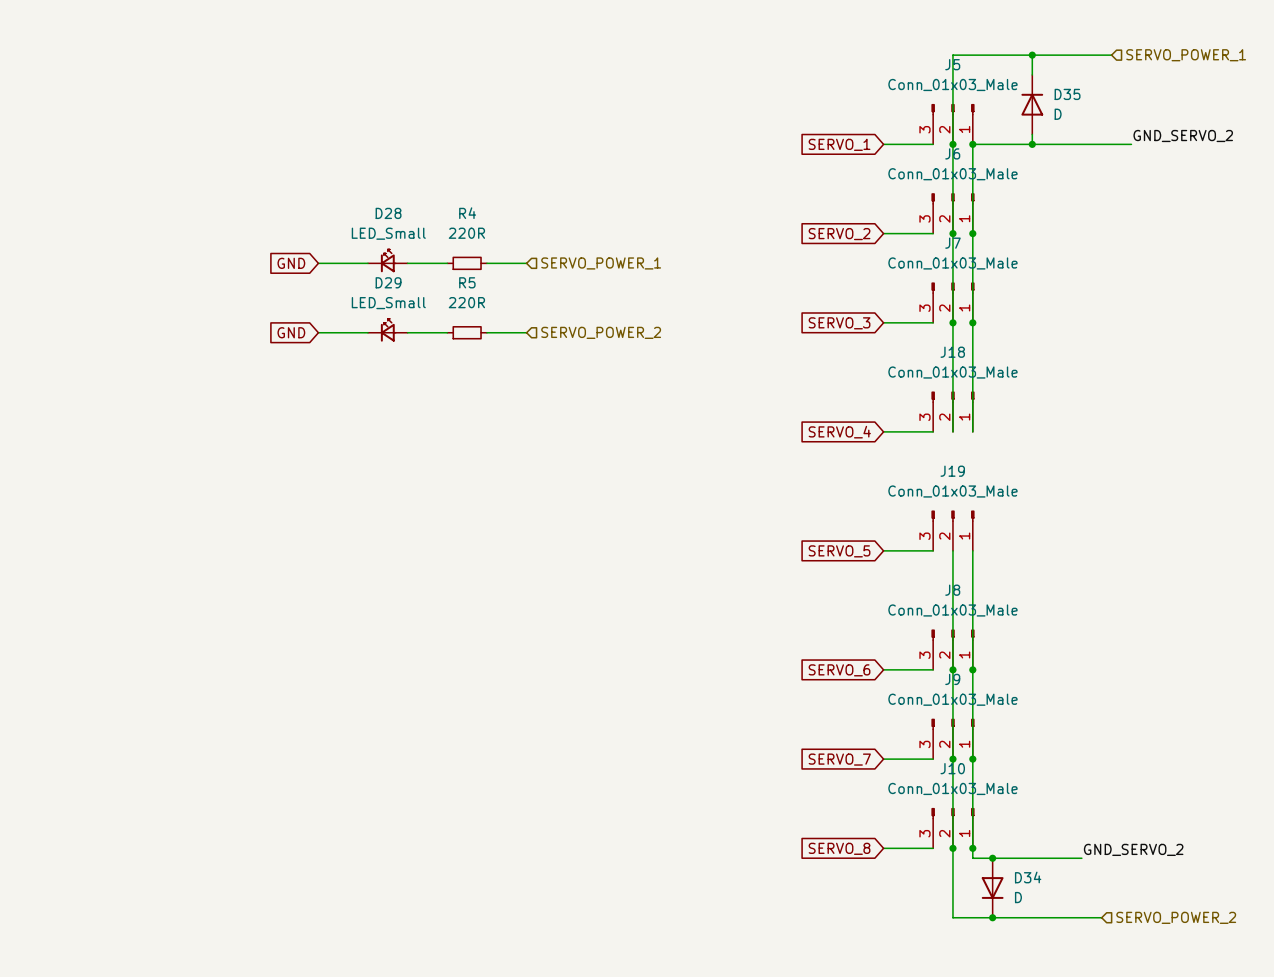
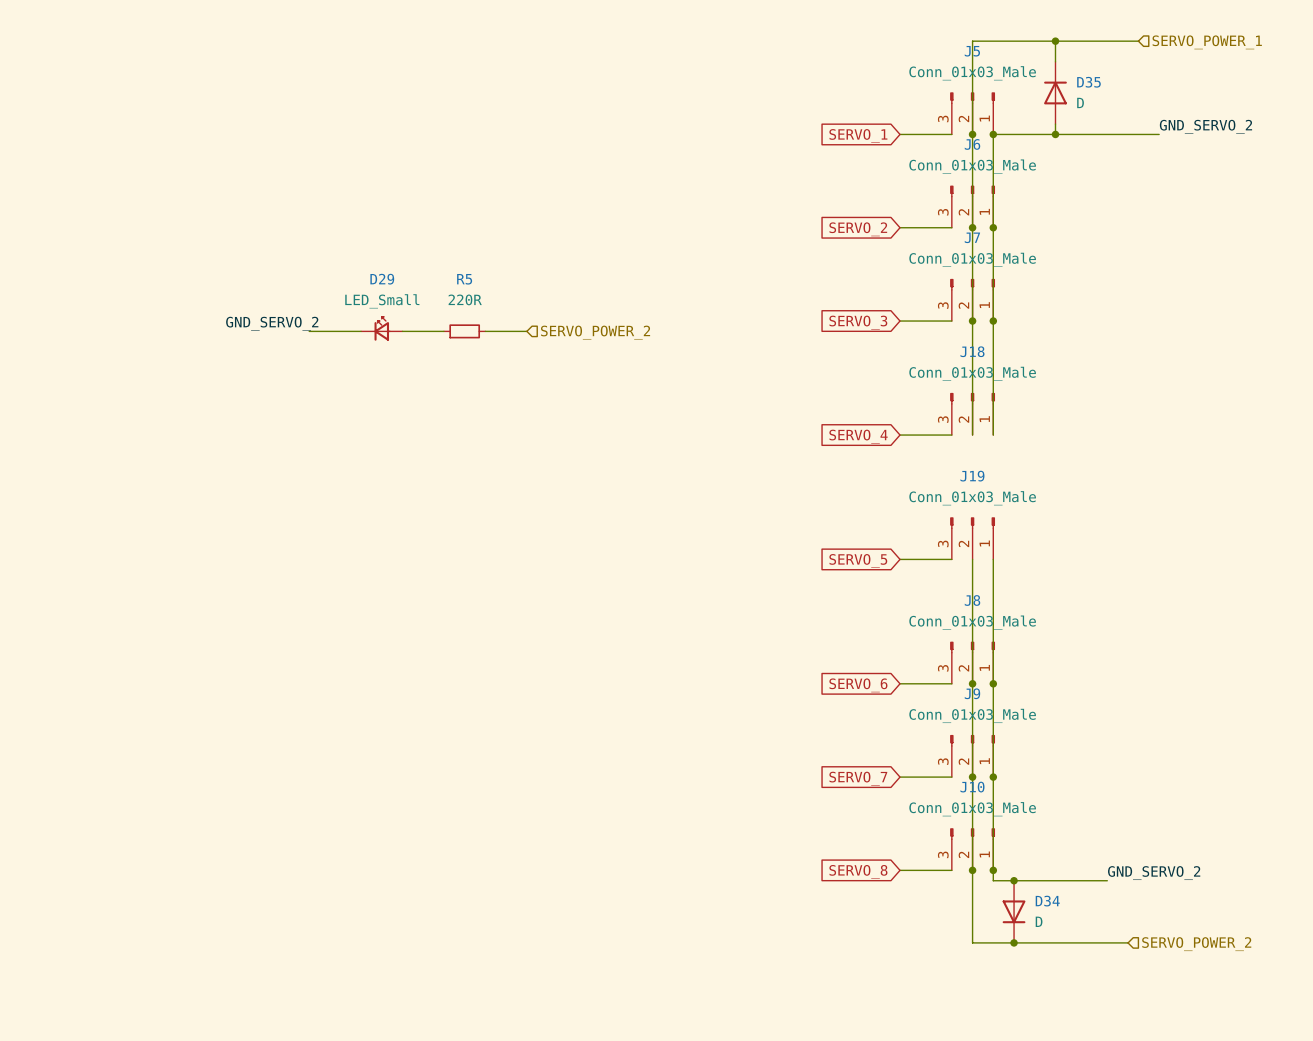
D28: LED_Small (387, 260) -> none
global label: GND (291, 263) -> none
wire: (318, 263) (367, 263) -> none
wire: (407, 263) (447, 263) -> none
R4: 220R (467, 263) -> none
wire: (486, 263) (526, 263) -> none
hierarchical label: SERVO_POWER_1 (601, 263) -> none
label: none -> GND_SERVO_2 (272, 323)
global label: GND (291, 332) -> none

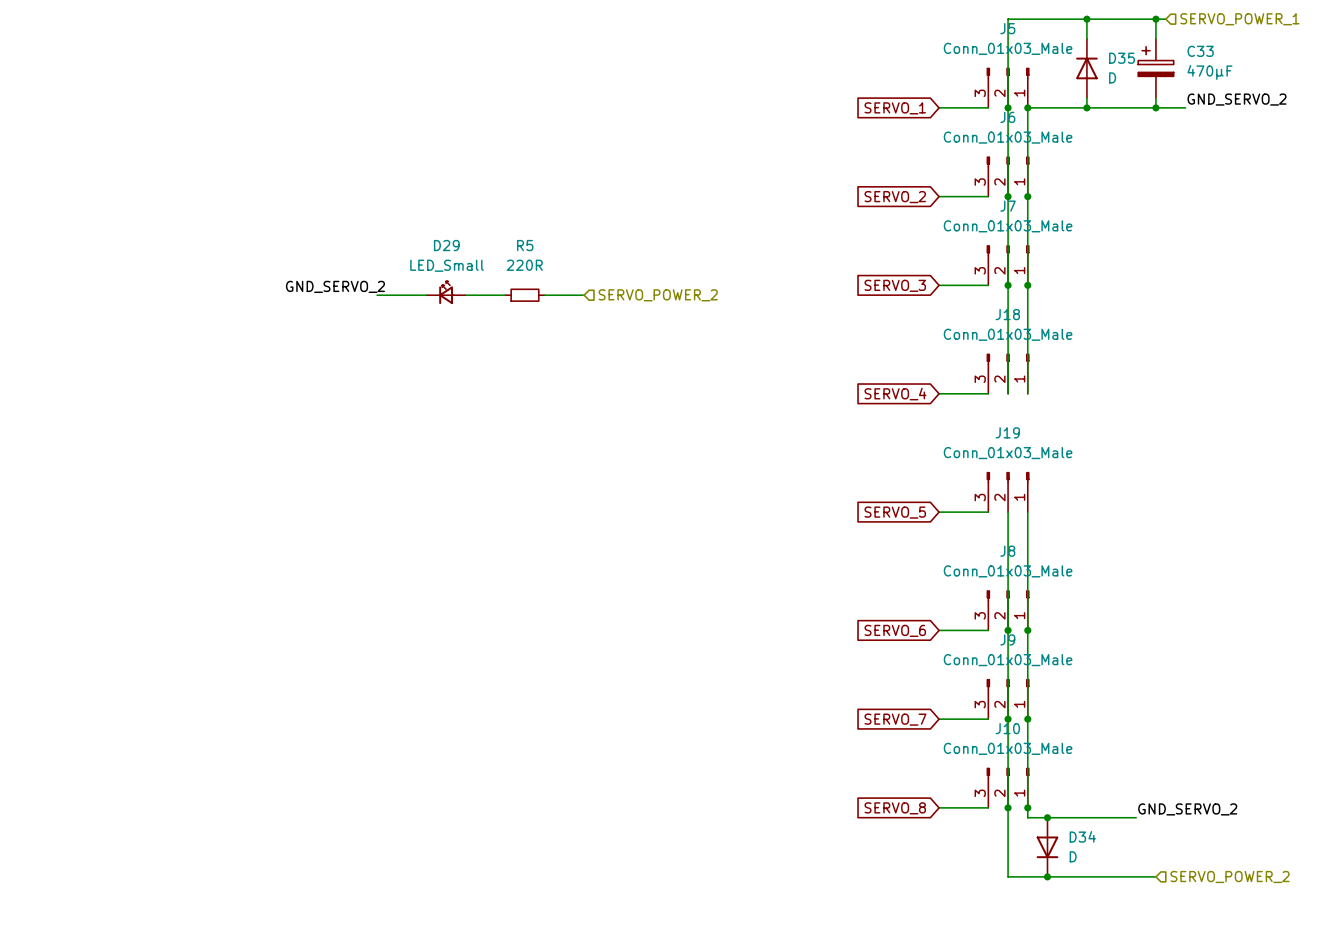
wire: none -> (1155, 19) (1155, 38)
junction: none -> (1155, 19)
C33: none -> 470µF (1155, 68)
wire: none -> (1155, 98) (1155, 107)
junction: none -> (1155, 107)

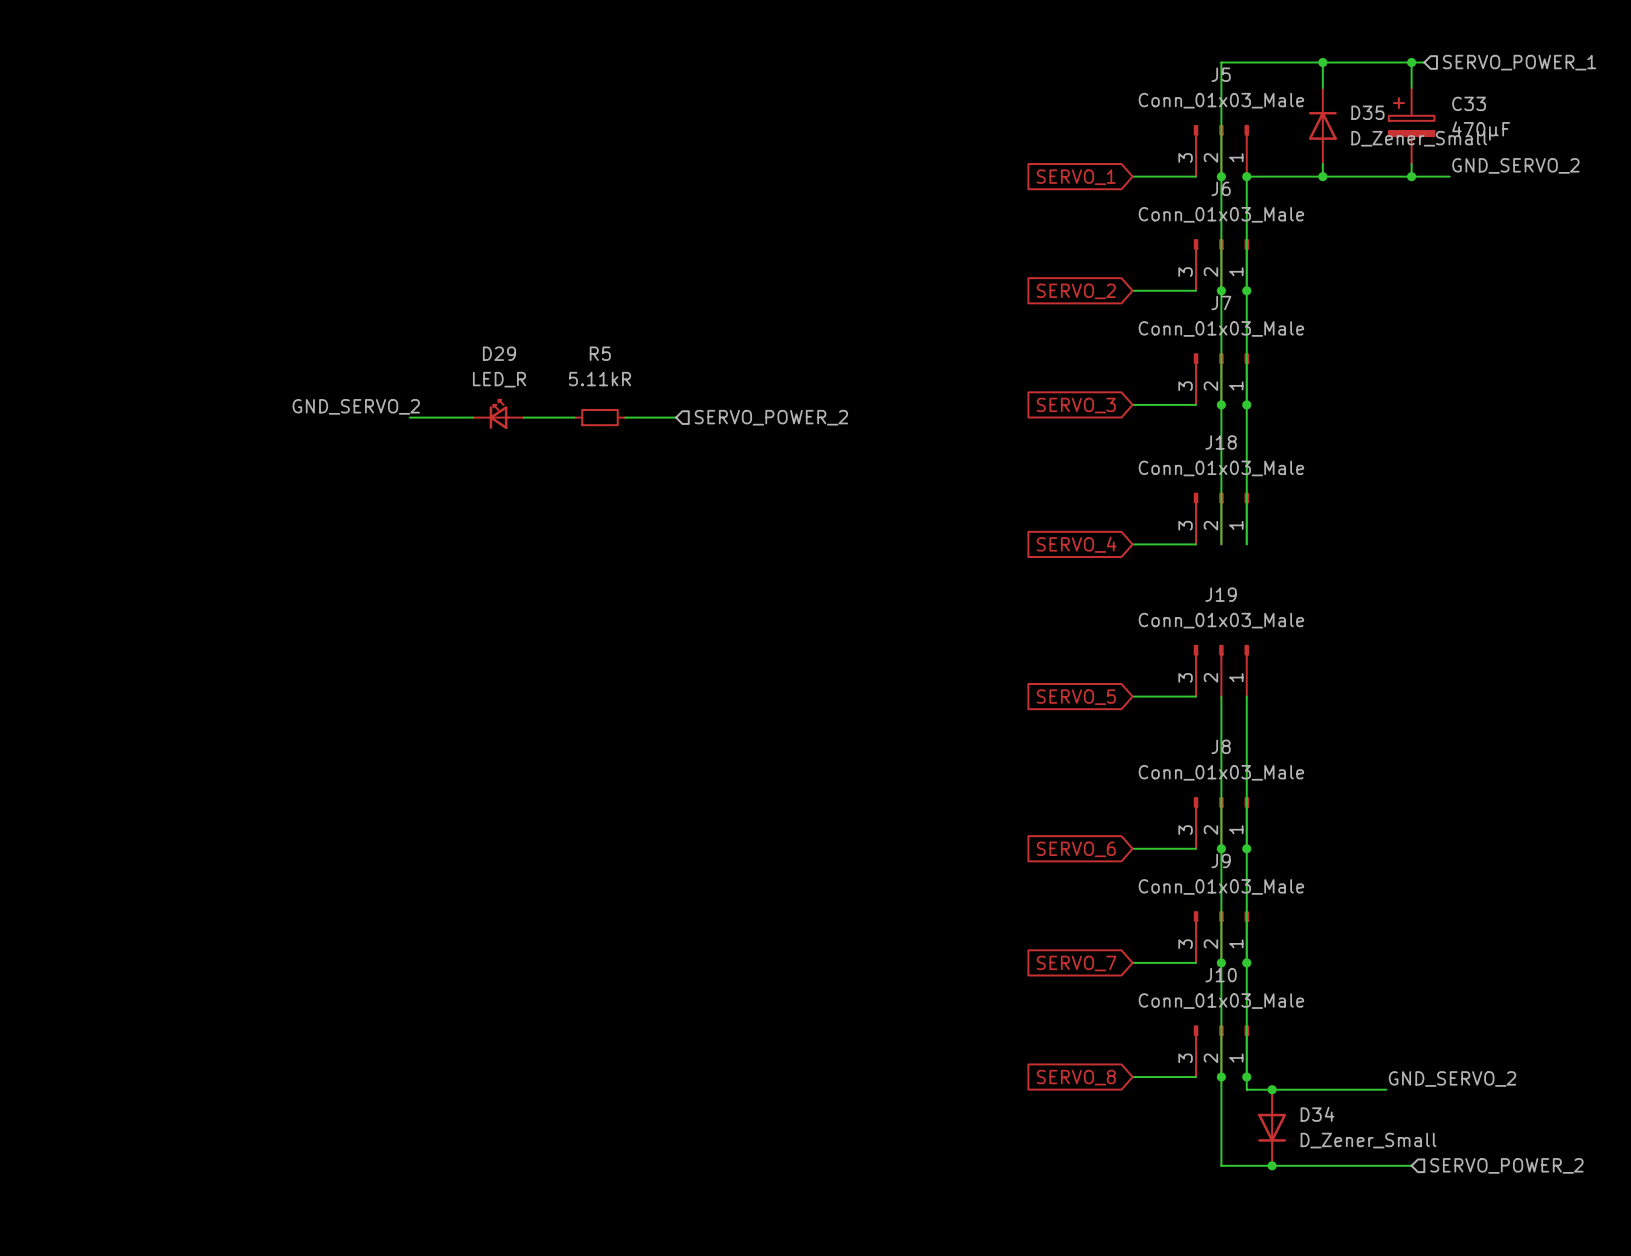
D35 value: D (1112, 77) -> D_Zener_Small (1419, 138)
D29 value: LED_Small (447, 265) -> LED_R (499, 379)
R5 value: 220R (524, 265) -> 5.11kR (599, 379)
D34 value: D (1073, 856) -> D_Zener_Small (1368, 1140)

